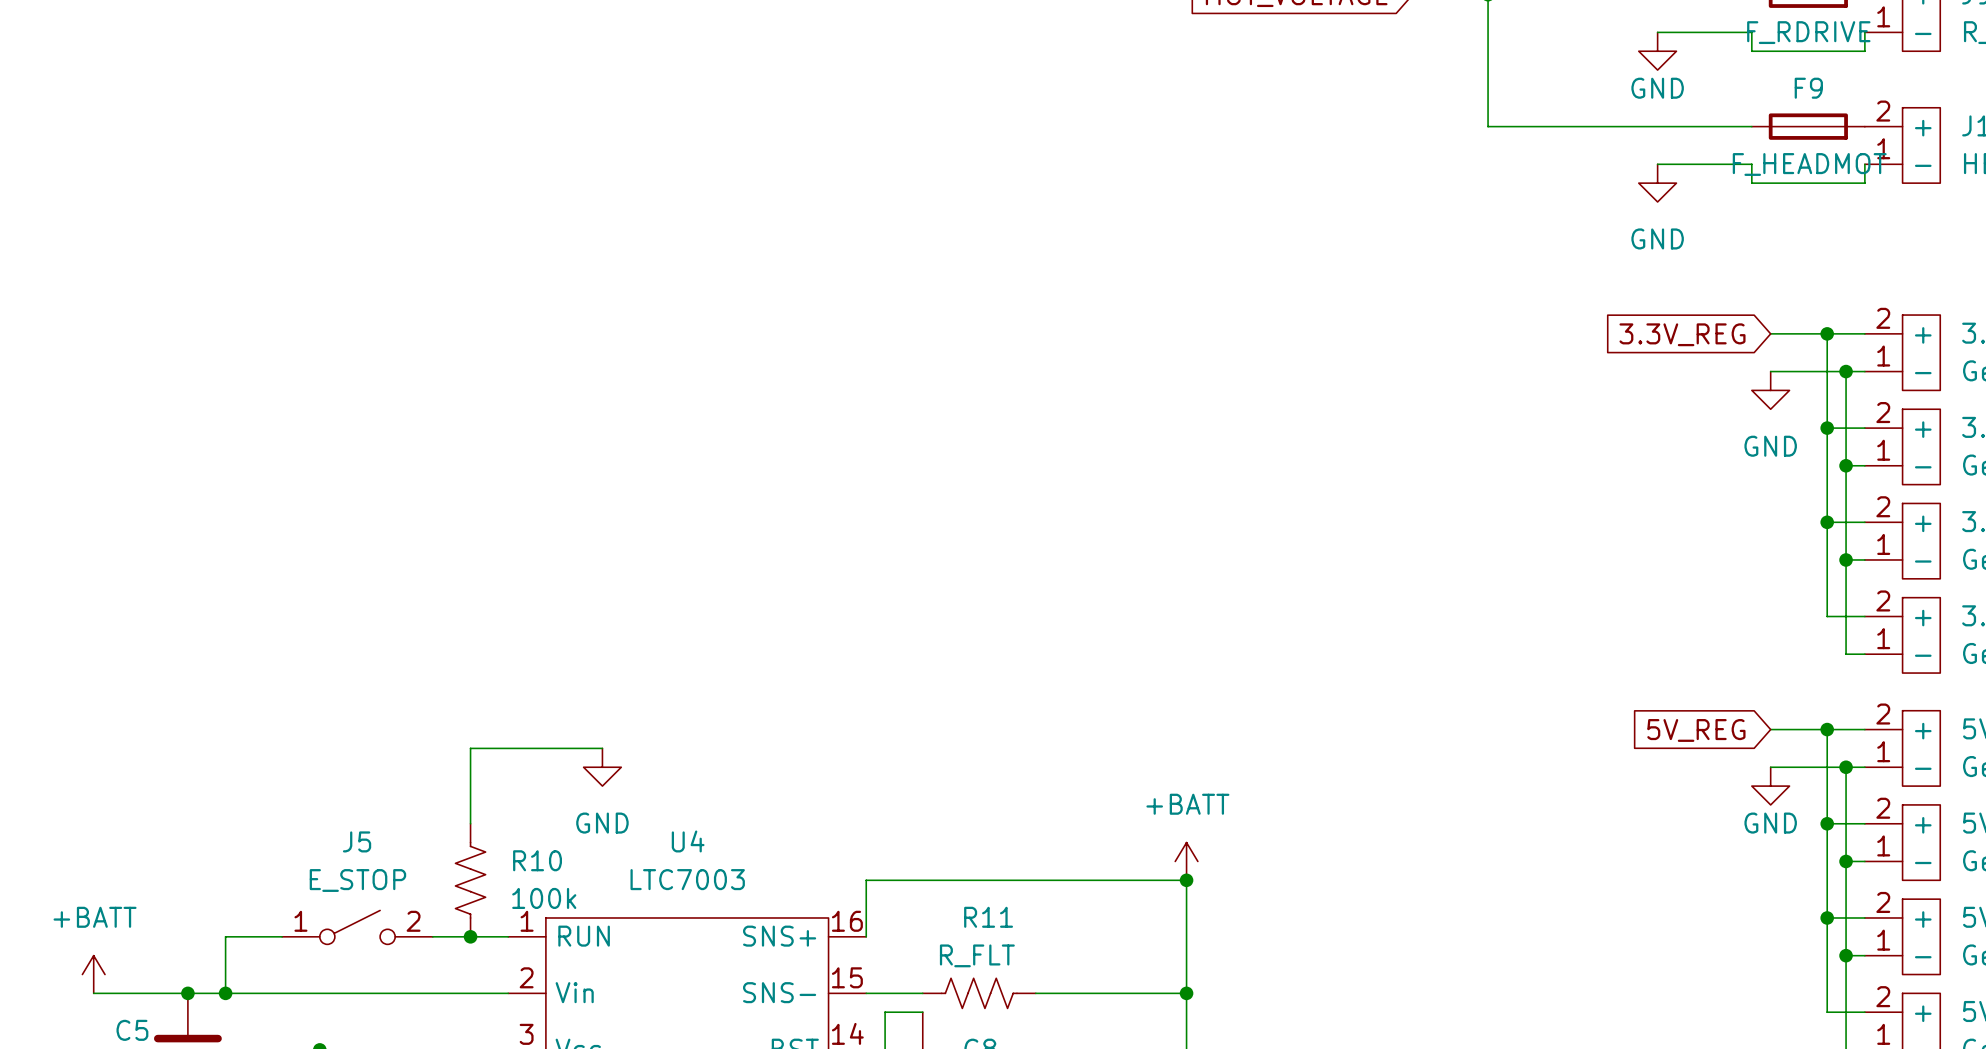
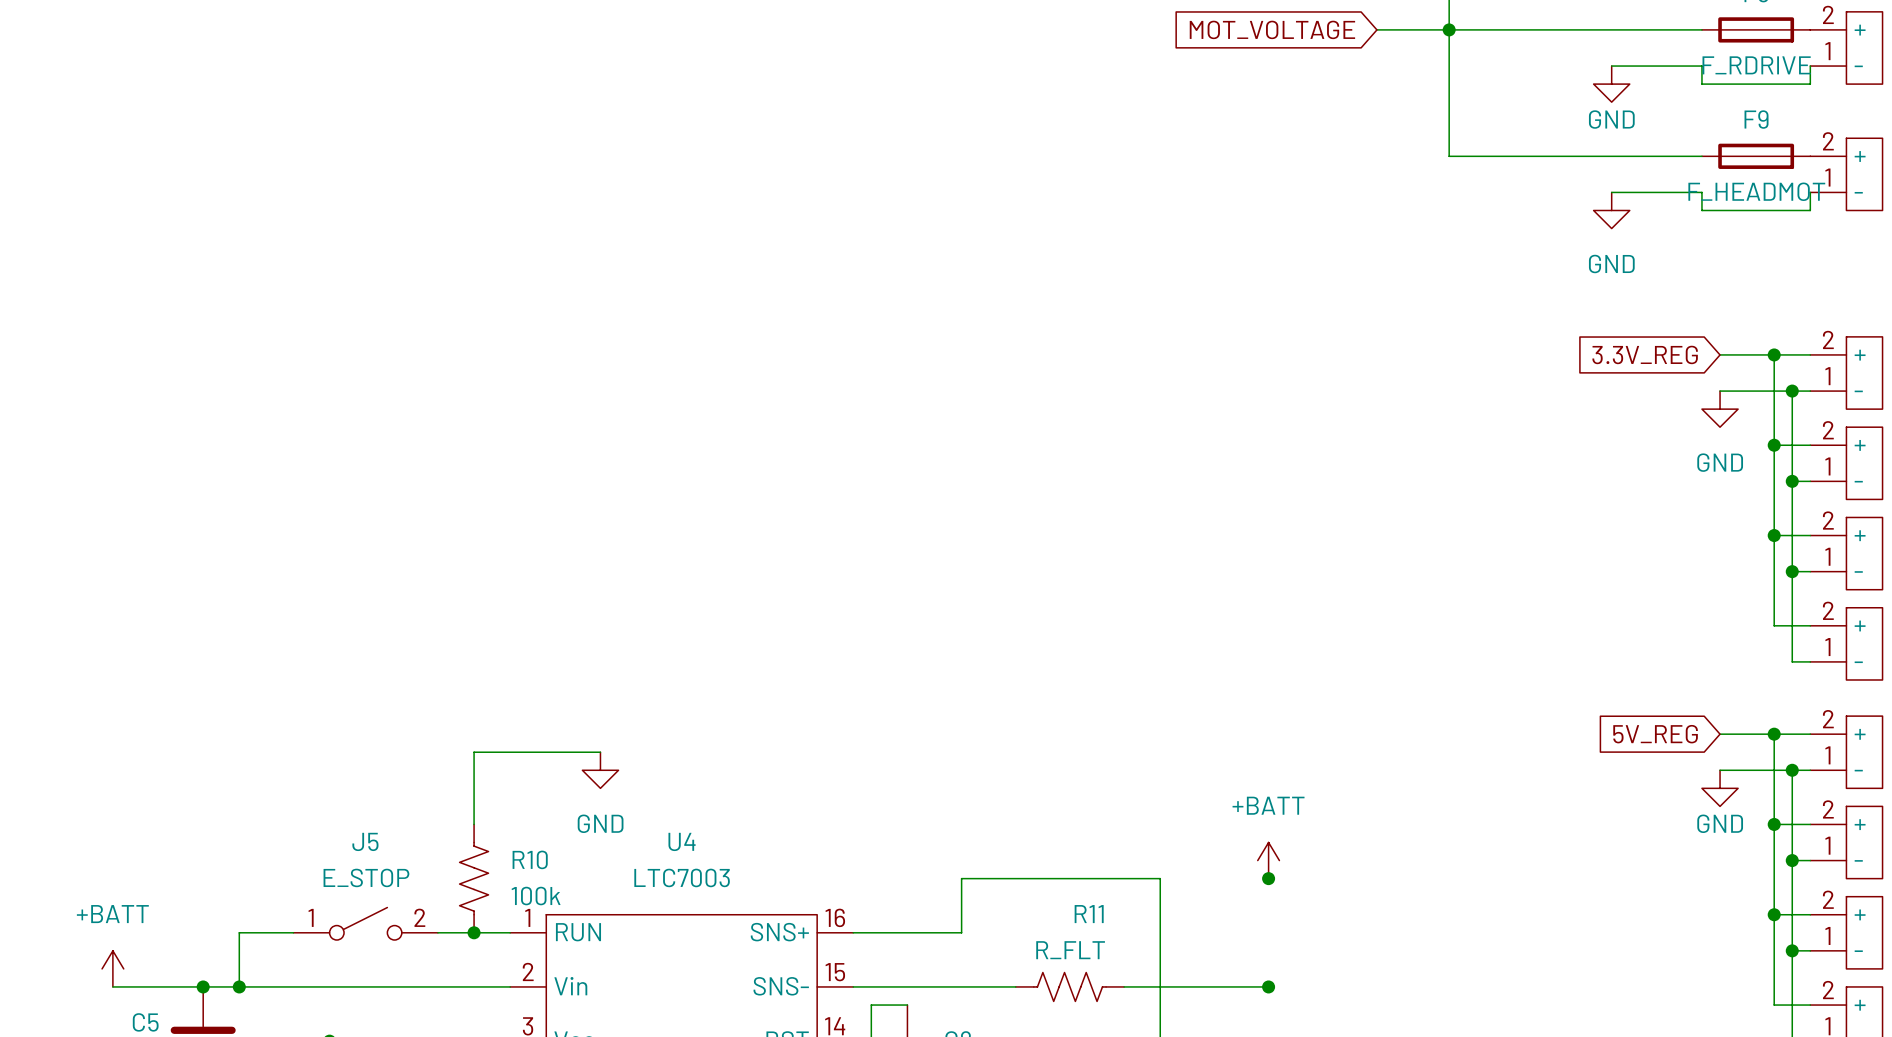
power symbol position: +BATT (1186, 861) -> +BATT (1268, 860)
wire: (979, 880) (866, 880) (866, 936) -> (961, 878) (961, 932) (853, 932)
junction: (1186, 880) -> none
junction: none -> (1268, 878)
R11 position: (979, 993) -> (1069, 986)
wire: (1035, 993) (1148, 993) -> (1015, 986) (907, 986)
wire: none -> (1160, 986) (1268, 986)
junction: (1186, 993) -> none
junction: none -> (1268, 986)

